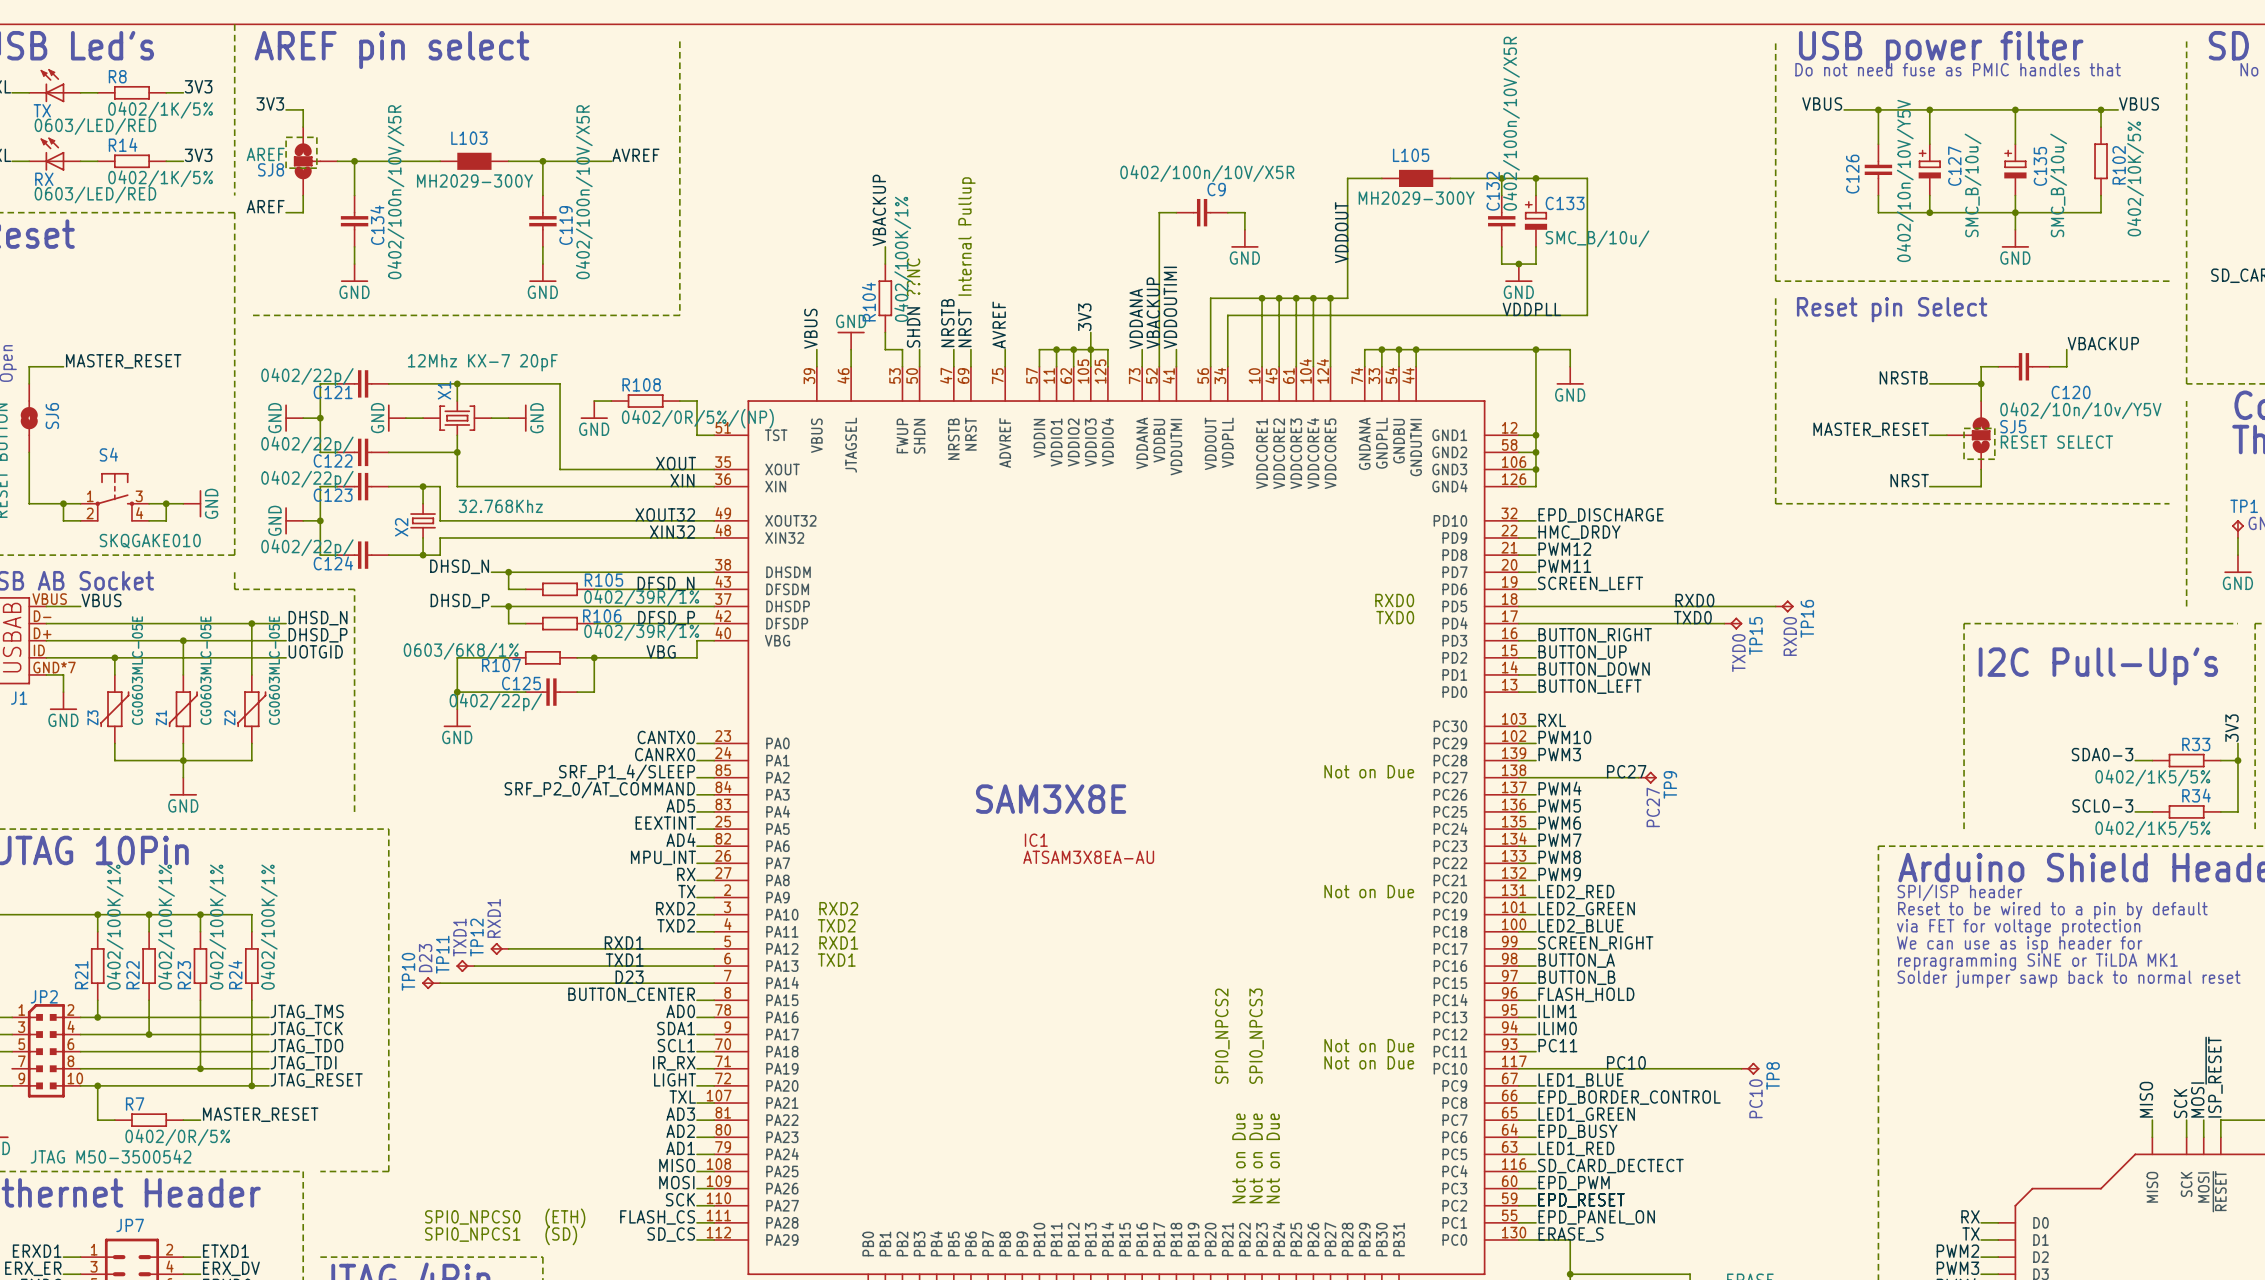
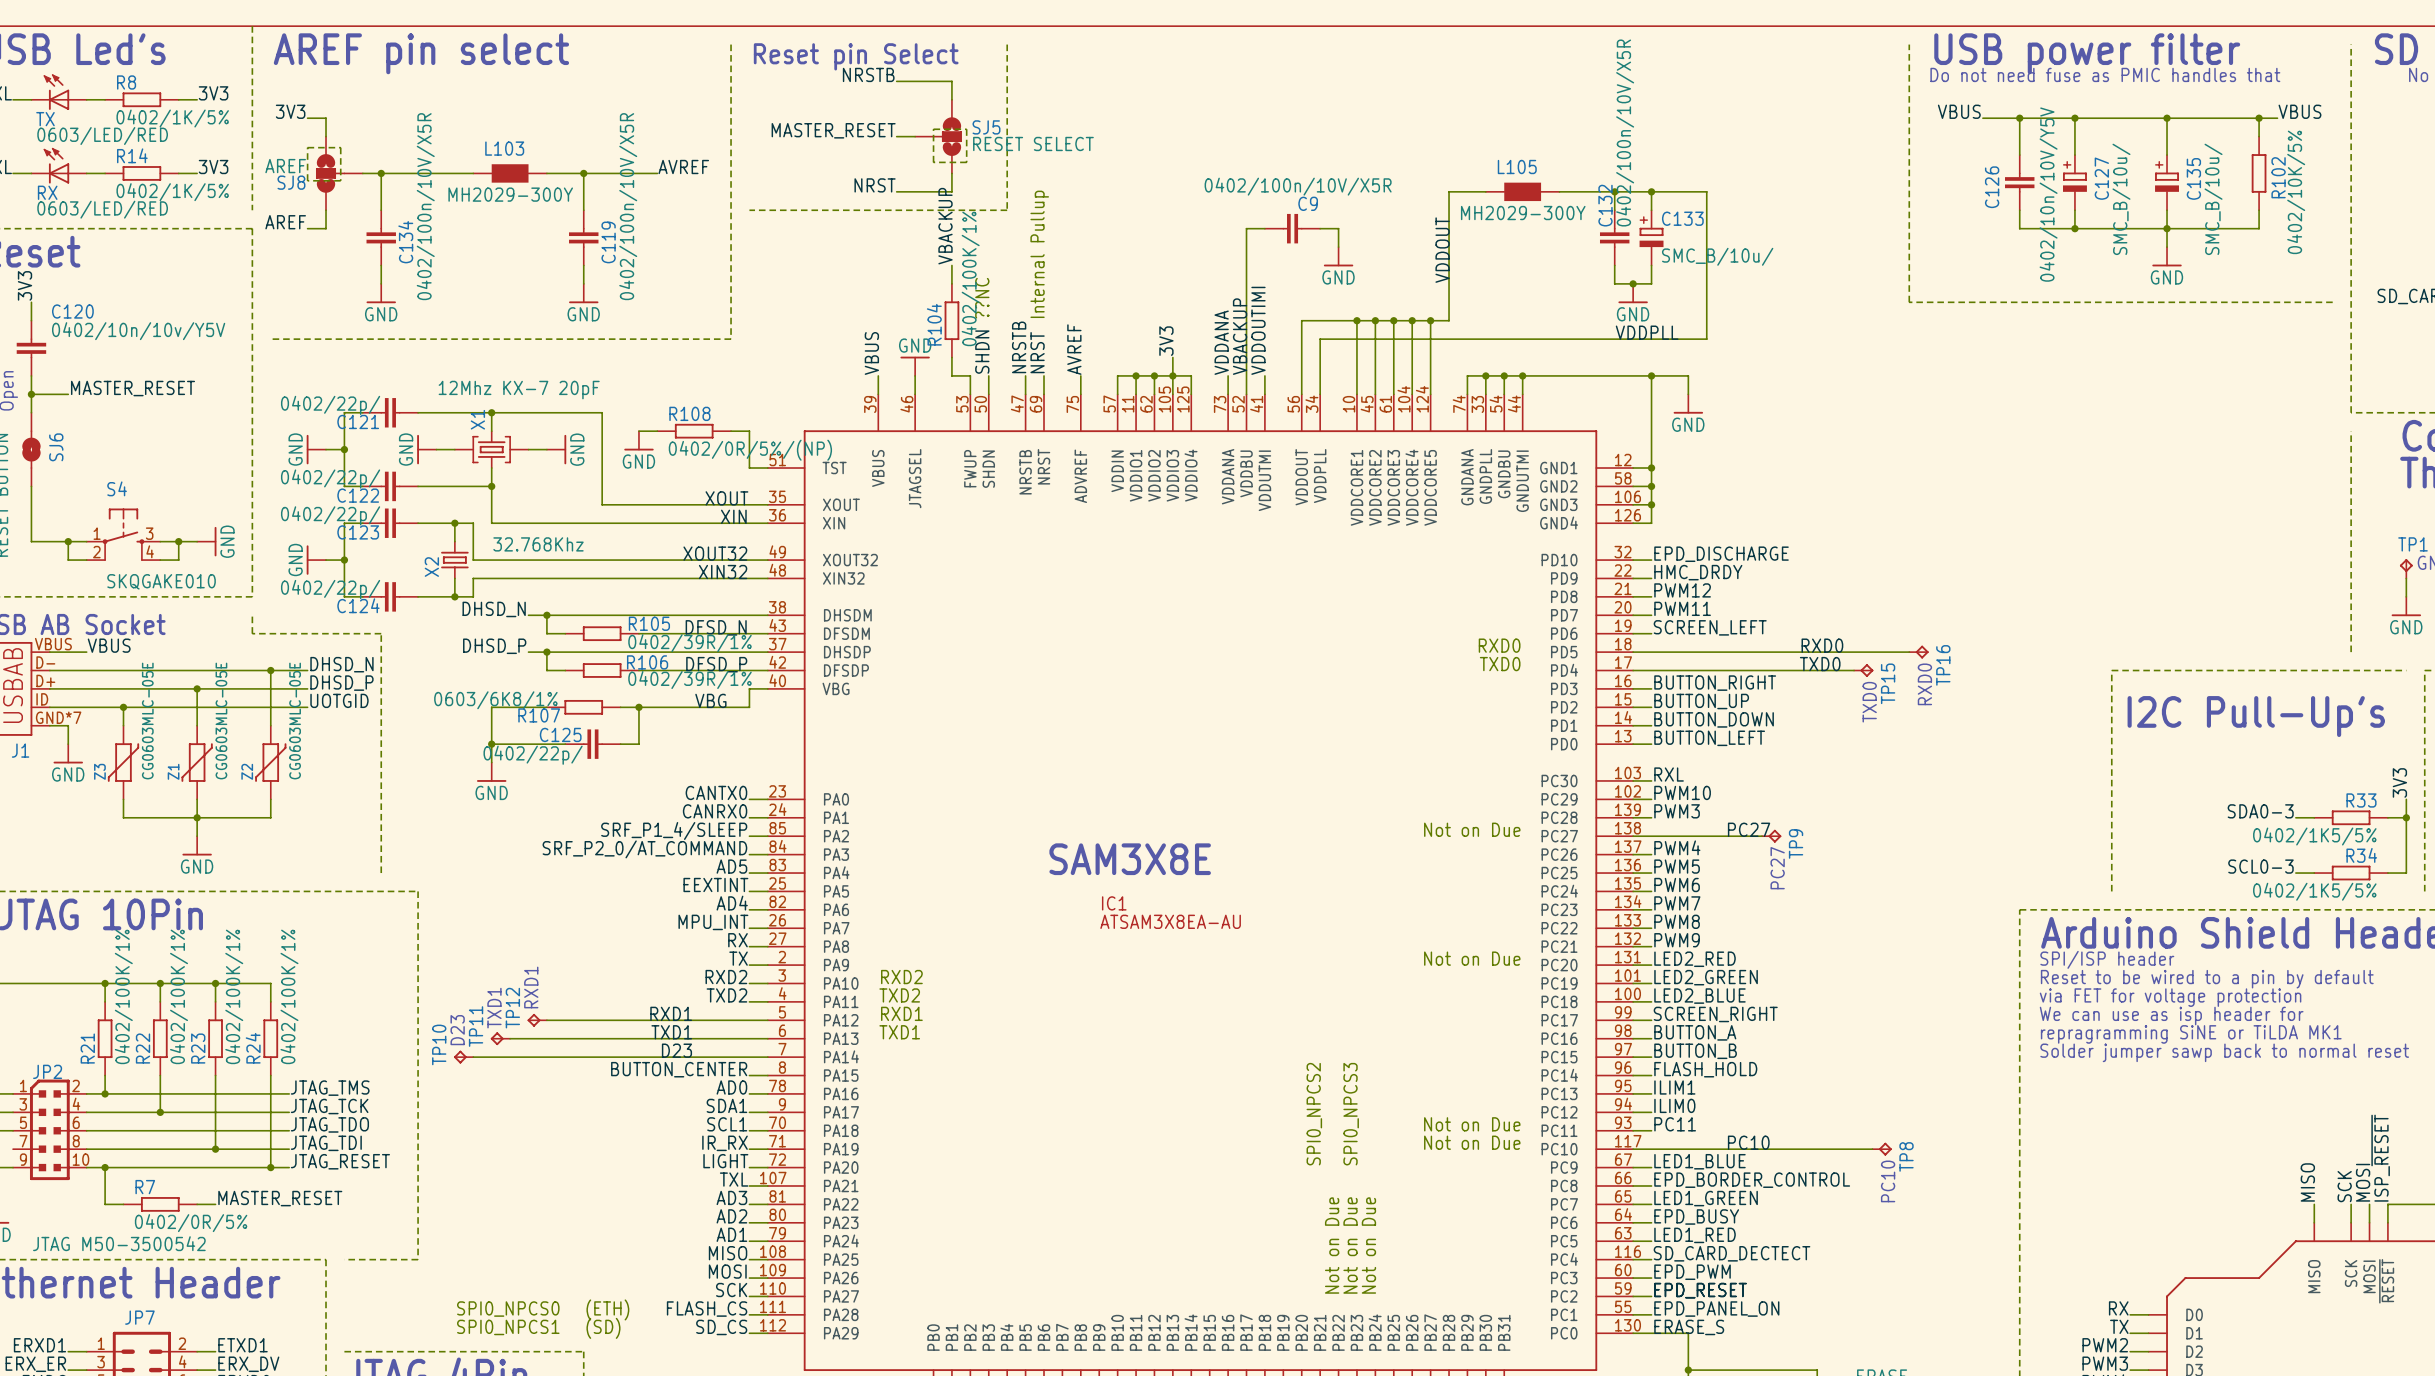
wire: none -> (1007, 44) (1007, 210) (749, 210)
text: none -> Reset pin Select (856, 56)
label: none -> NRSTB (868, 74)
wire: none -> (896, 81) (951, 81) (951, 99)
wire: none -> (933, 129) (966, 129) (966, 162) (933, 162) (933, 129)
label: none -> MASTER_RESET (833, 130)
wire: none -> (896, 136) (915, 136)
wire: none -> (951, 173) (951, 191) (896, 191)
label: none -> NRST (875, 185)
label: none -> 3V3 (25, 285)
wire: none -> (31, 302) (31, 320)
wire: (1775, 298) (1775, 503) (2169, 503) -> none
text: Reset pin Select (1892, 309) -> none
label: VBACKUP (2103, 343) -> none
wire: none -> (31, 375) (31, 394)
wire: (2066, 349) (2066, 366) (2049, 366) -> none
junction: none -> (31, 394)
wire: (1998, 366) (1981, 366) (1981, 401) -> none
C120 rotation: 0° (2023, 366) -> 90° clockwise (31, 348)
C120 position: (2023, 366) -> (31, 348)
label: NRSTB (1903, 377) -> none
wire: (1929, 383) (1981, 383) -> none
junction: (1981, 383) -> none
C120 name position: C120 (2071, 392) -> C120 (72, 311)
C120 value position: 0402/10n/10v/Y5V (2080, 410) -> 0402/10n/10v/Y5V (138, 331)
wire: (1964, 428) (1994, 428) (1994, 459) (1964, 459) (1964, 428) -> none
label: MASTER_RESET (1871, 429) -> none
wire: (1929, 435) (1946, 435) -> none
SJ5 position: (1968, 435) -> (938, 136)
wire: (1981, 469) (1981, 486) (1929, 486) -> none
label: NRST (1909, 480) -> none

